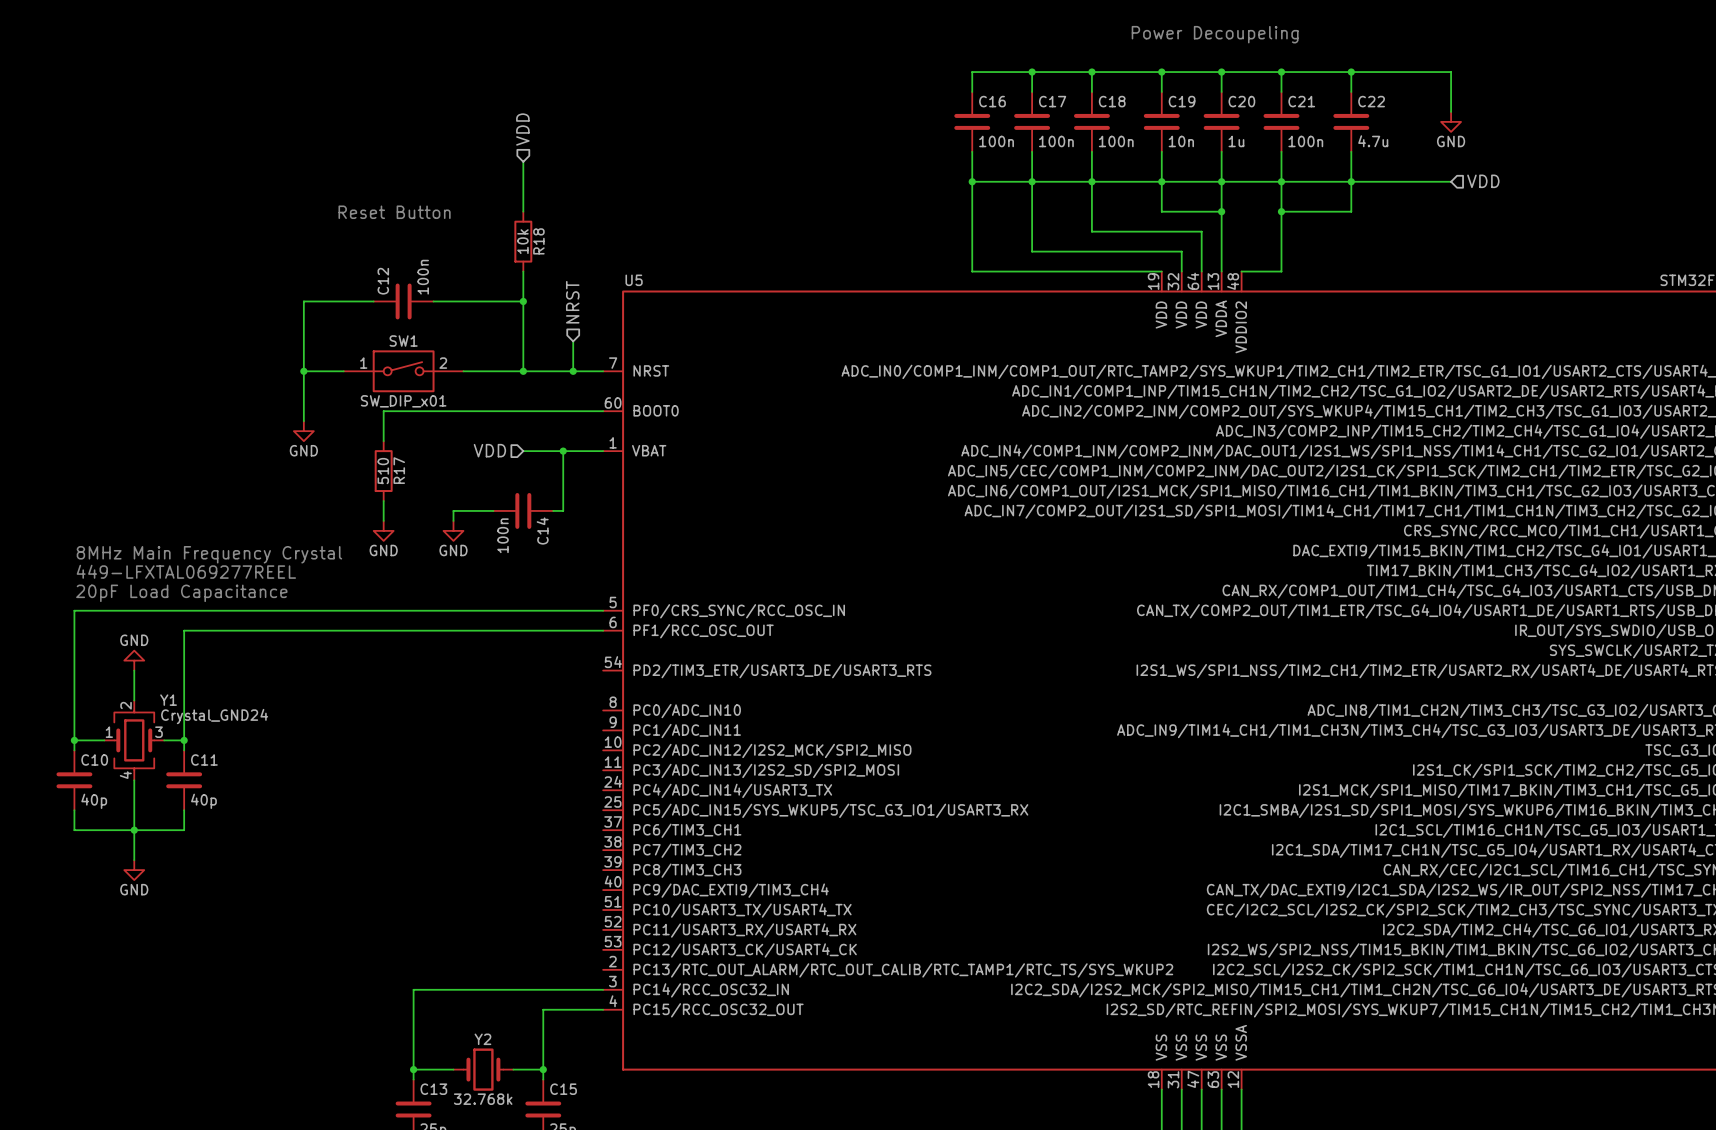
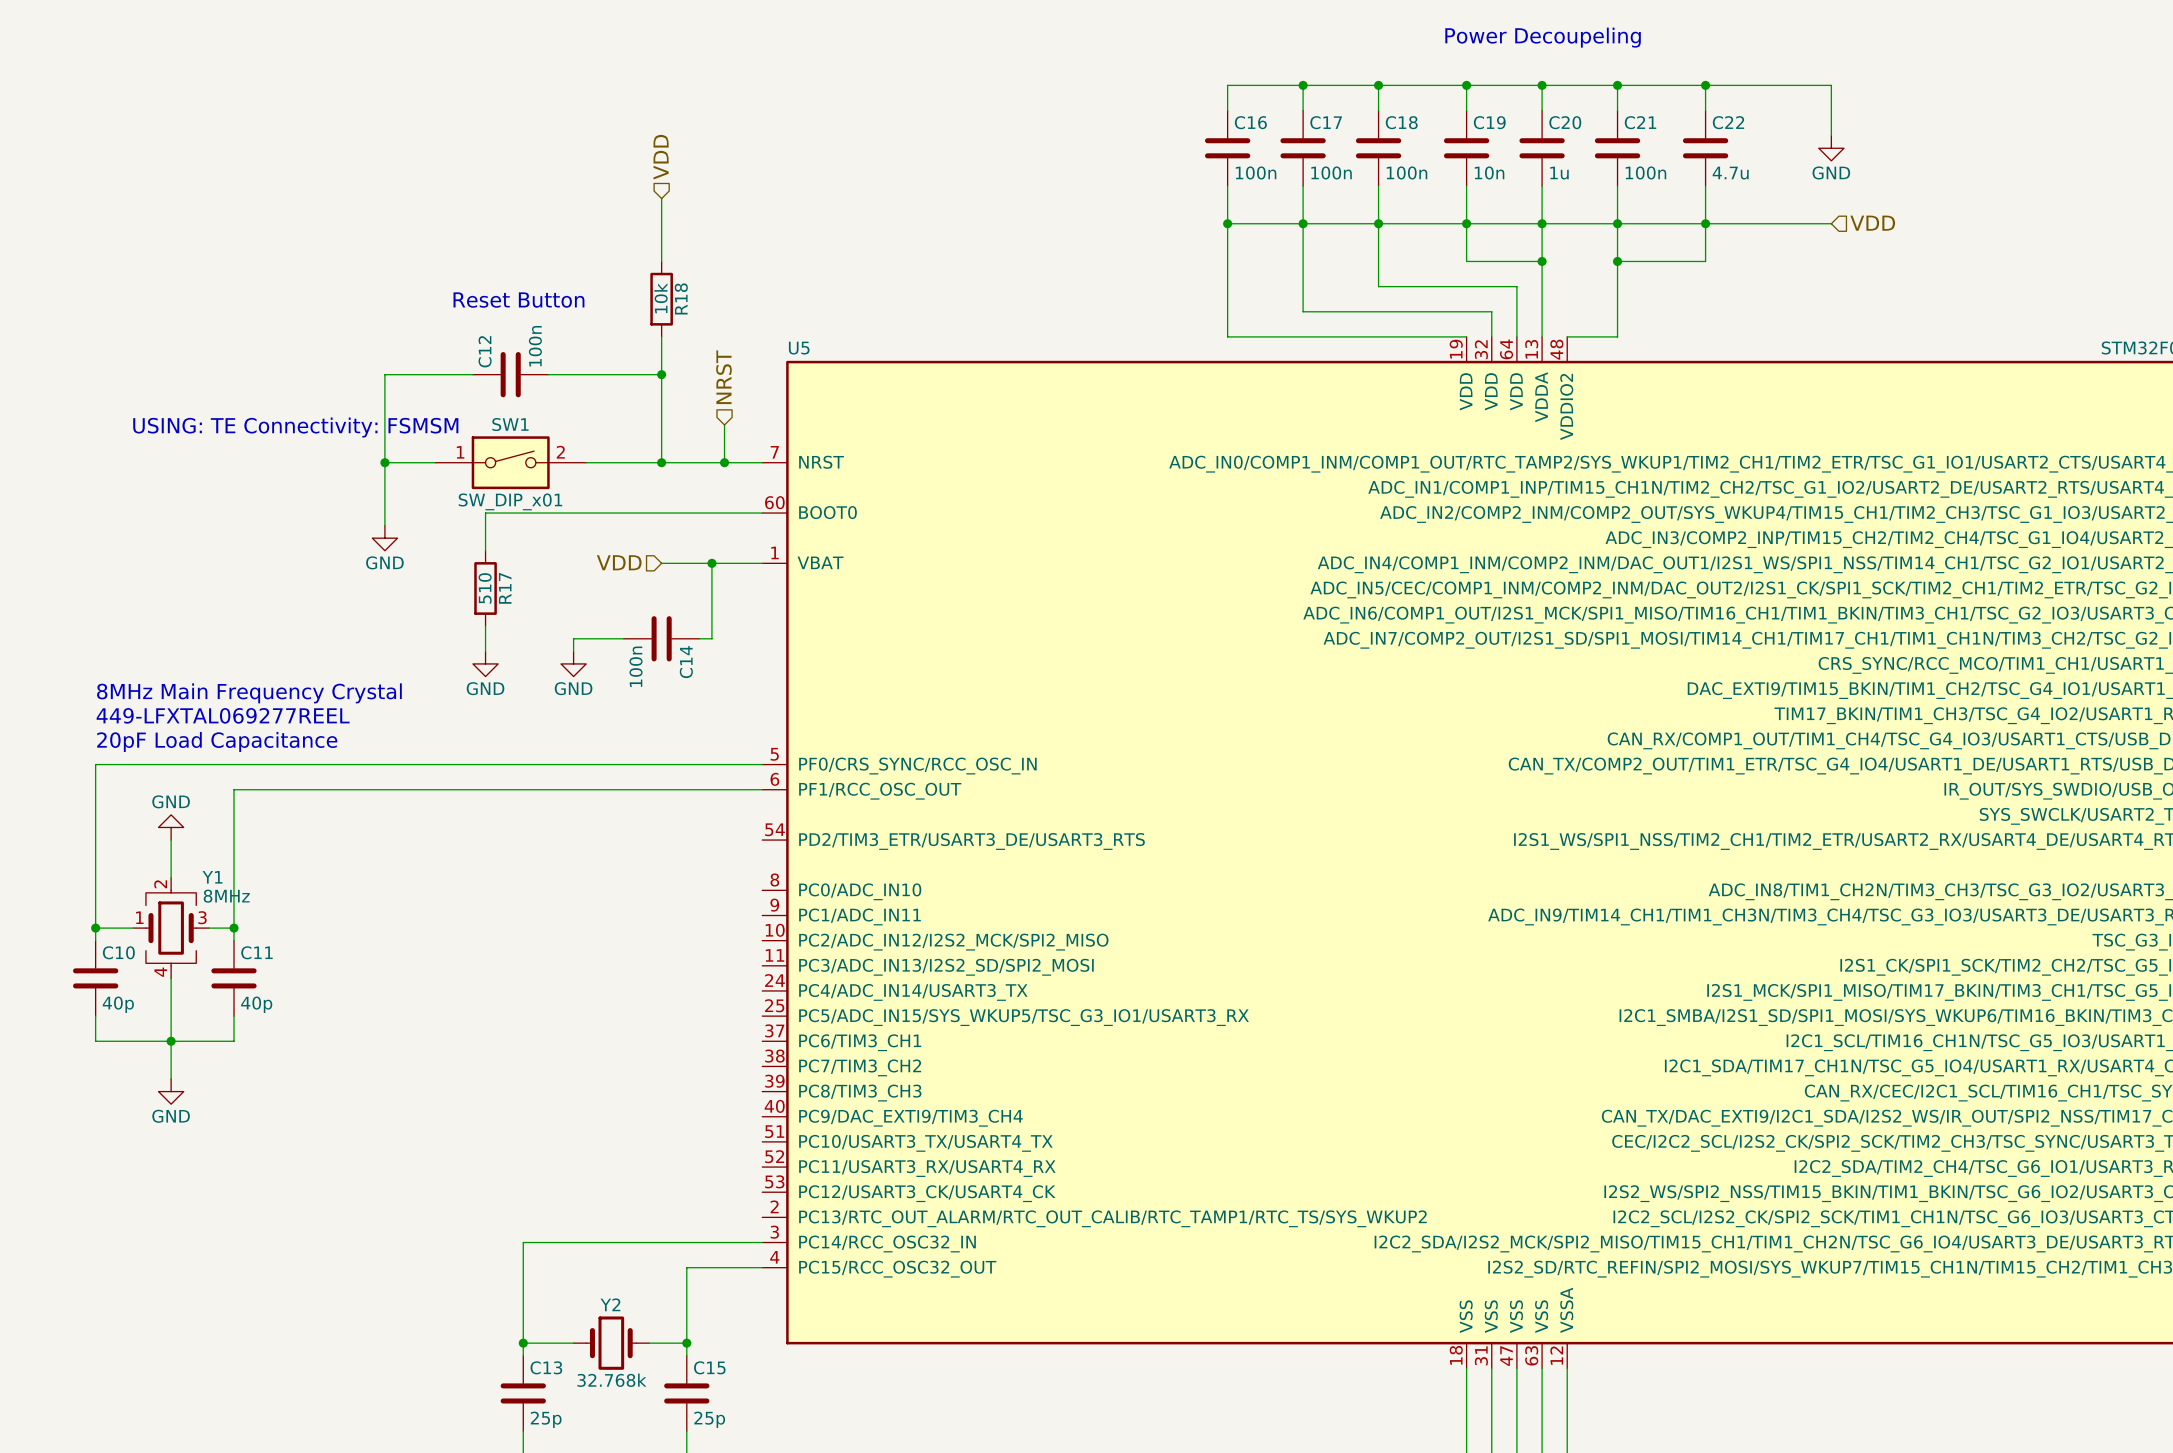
text position: Reset Button (394, 212) -> Reset Button (518, 300)
text: none -> USING: TE Connectivity: FSMSM (295, 427)
Y1 value: Crystal_GND24 (214, 716) -> 8MHz (226, 896)

